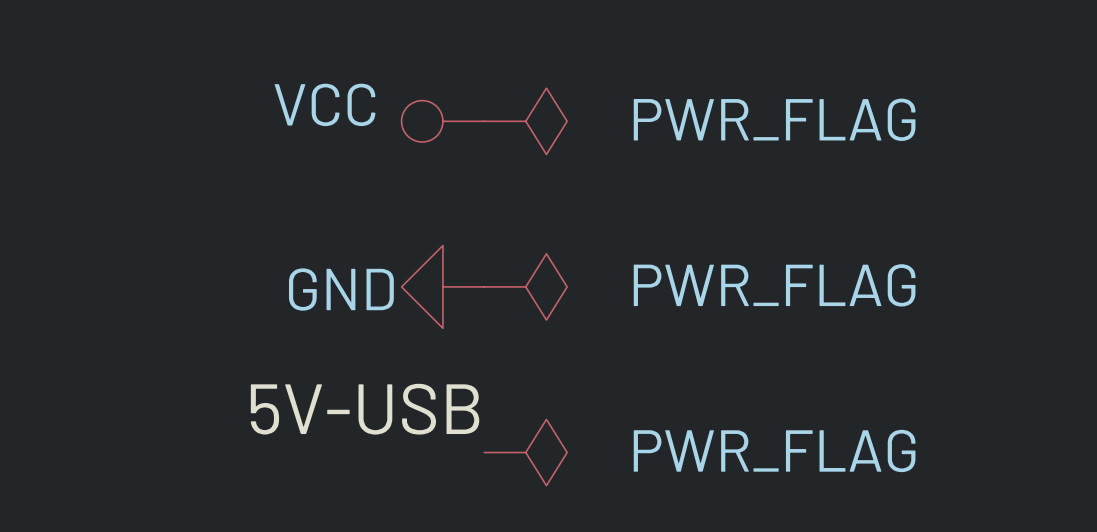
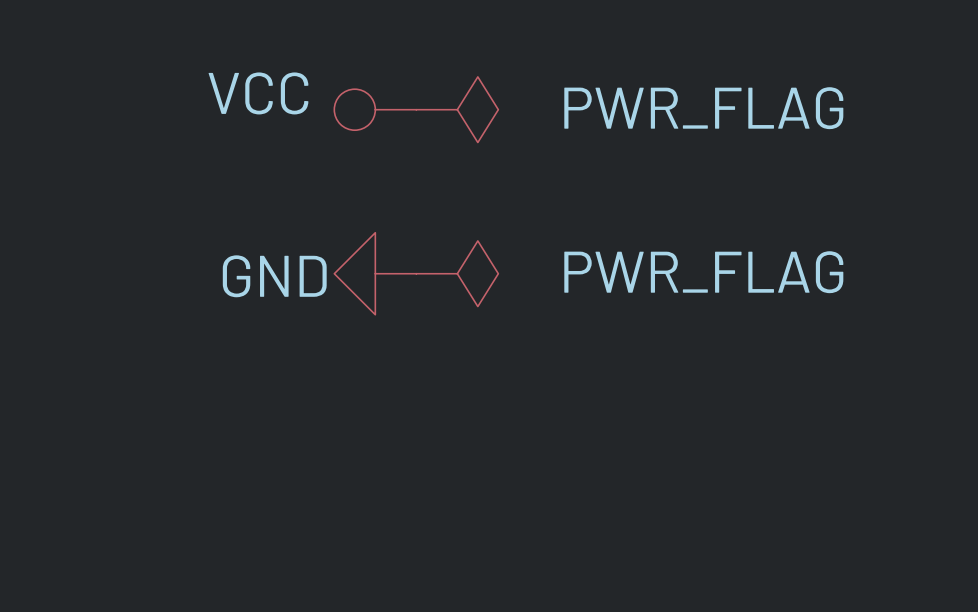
label: 5V-USB (365, 409) -> none
power symbol: PWR_FLAG (525, 452) -> none

